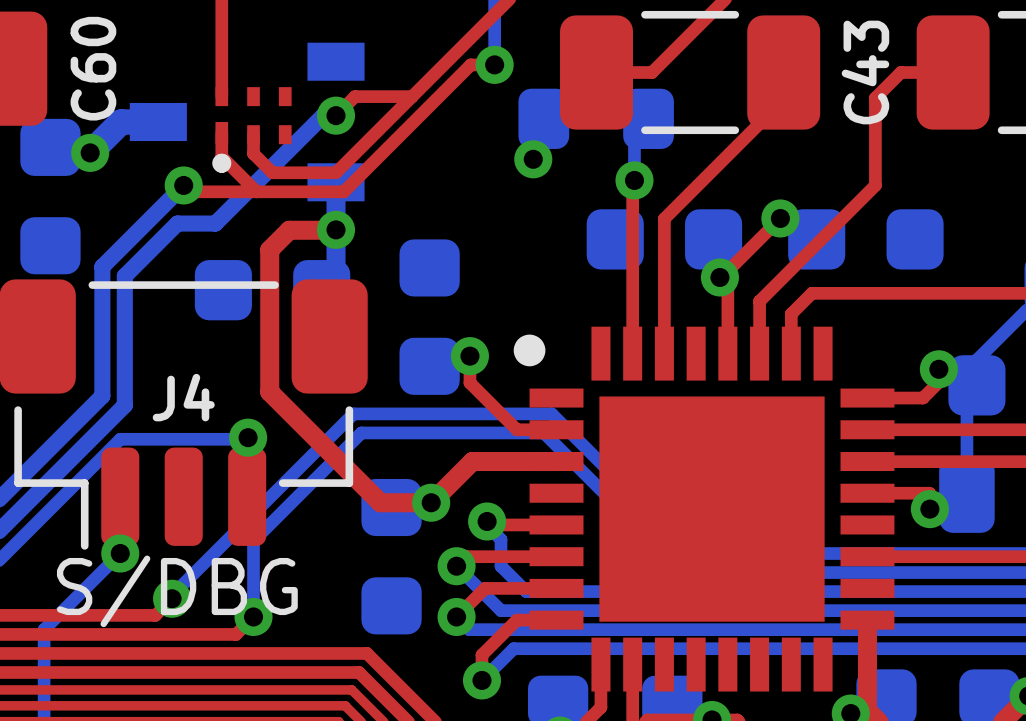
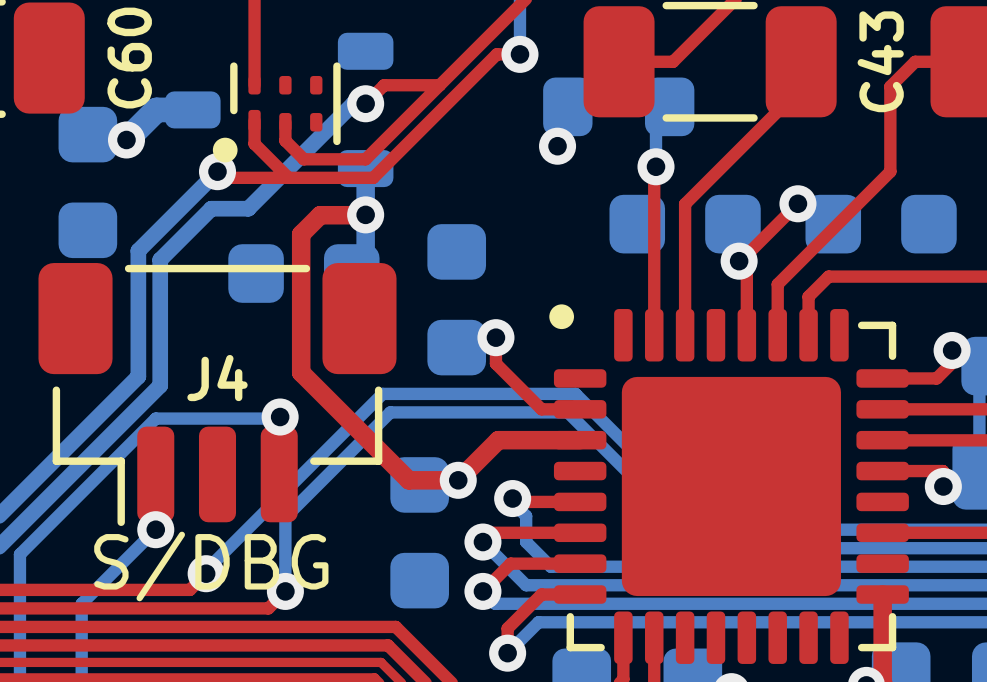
part footprint: [129, 42, 365, 202] -> [165, 32, 394, 188]
part: none -> (276, 112)
part: (251, 129) -> none
part footprint: [513, 326, 895, 692] -> [549, 304, 909, 664]

